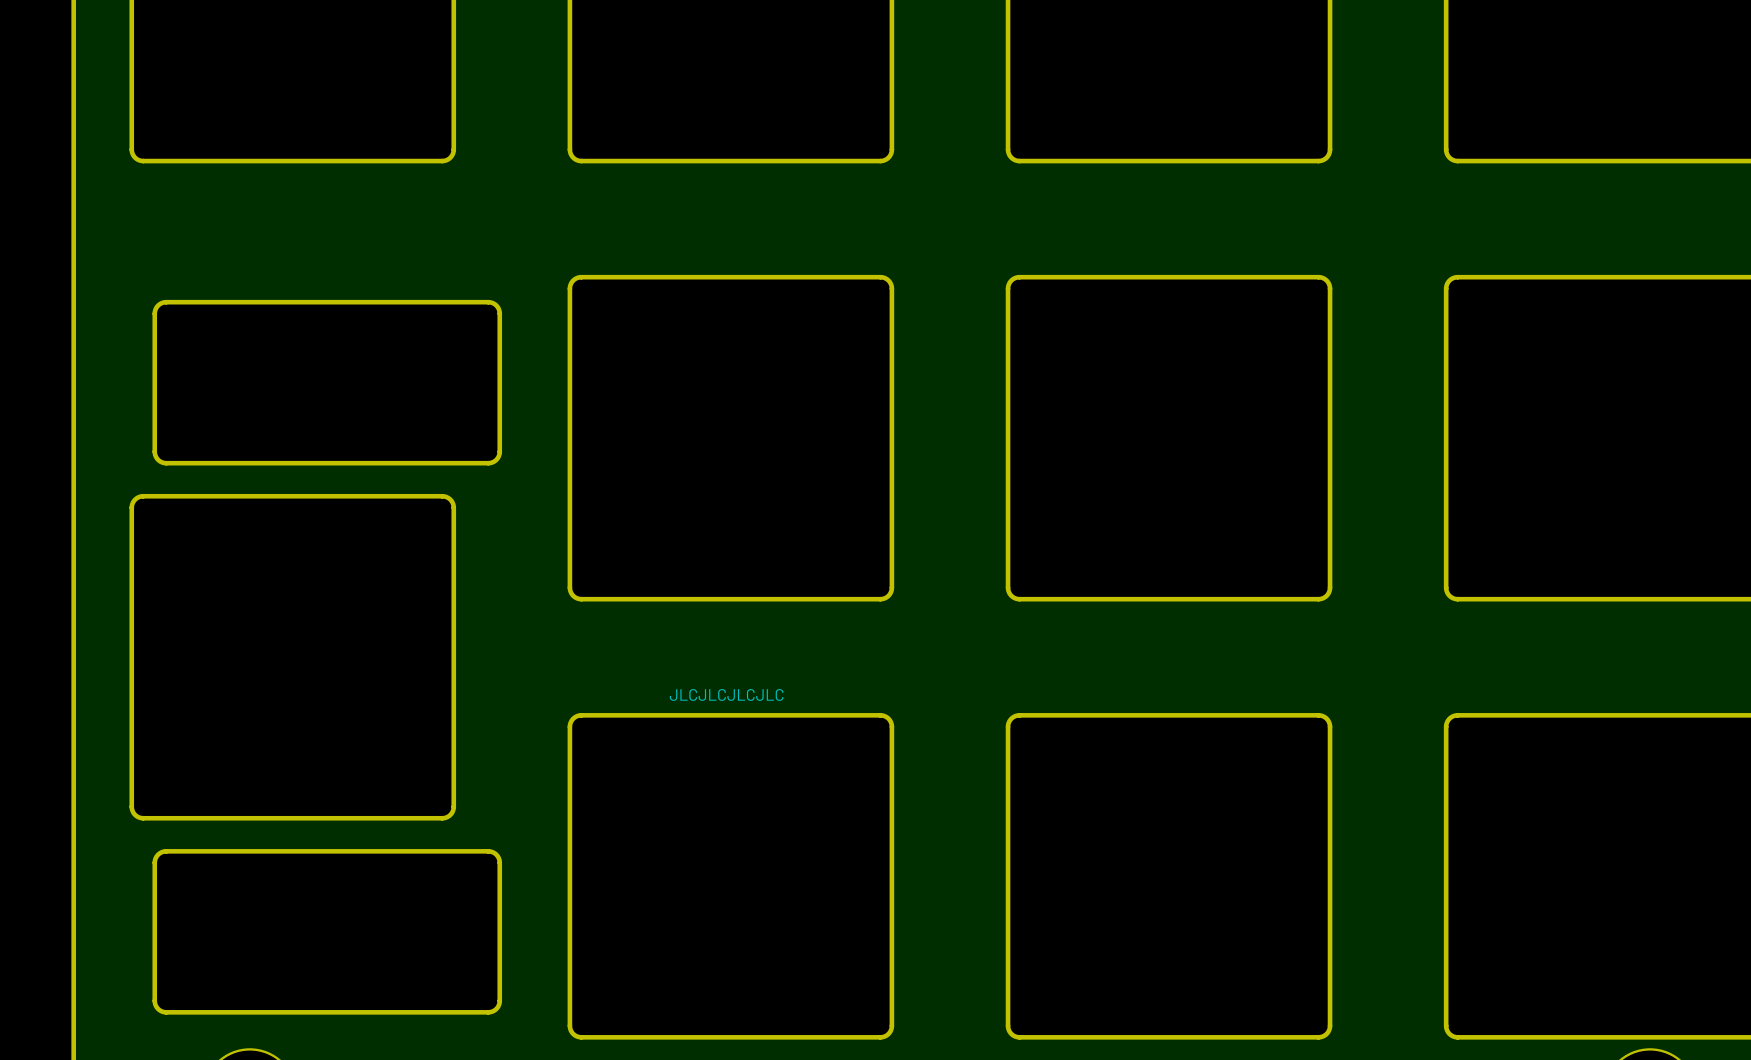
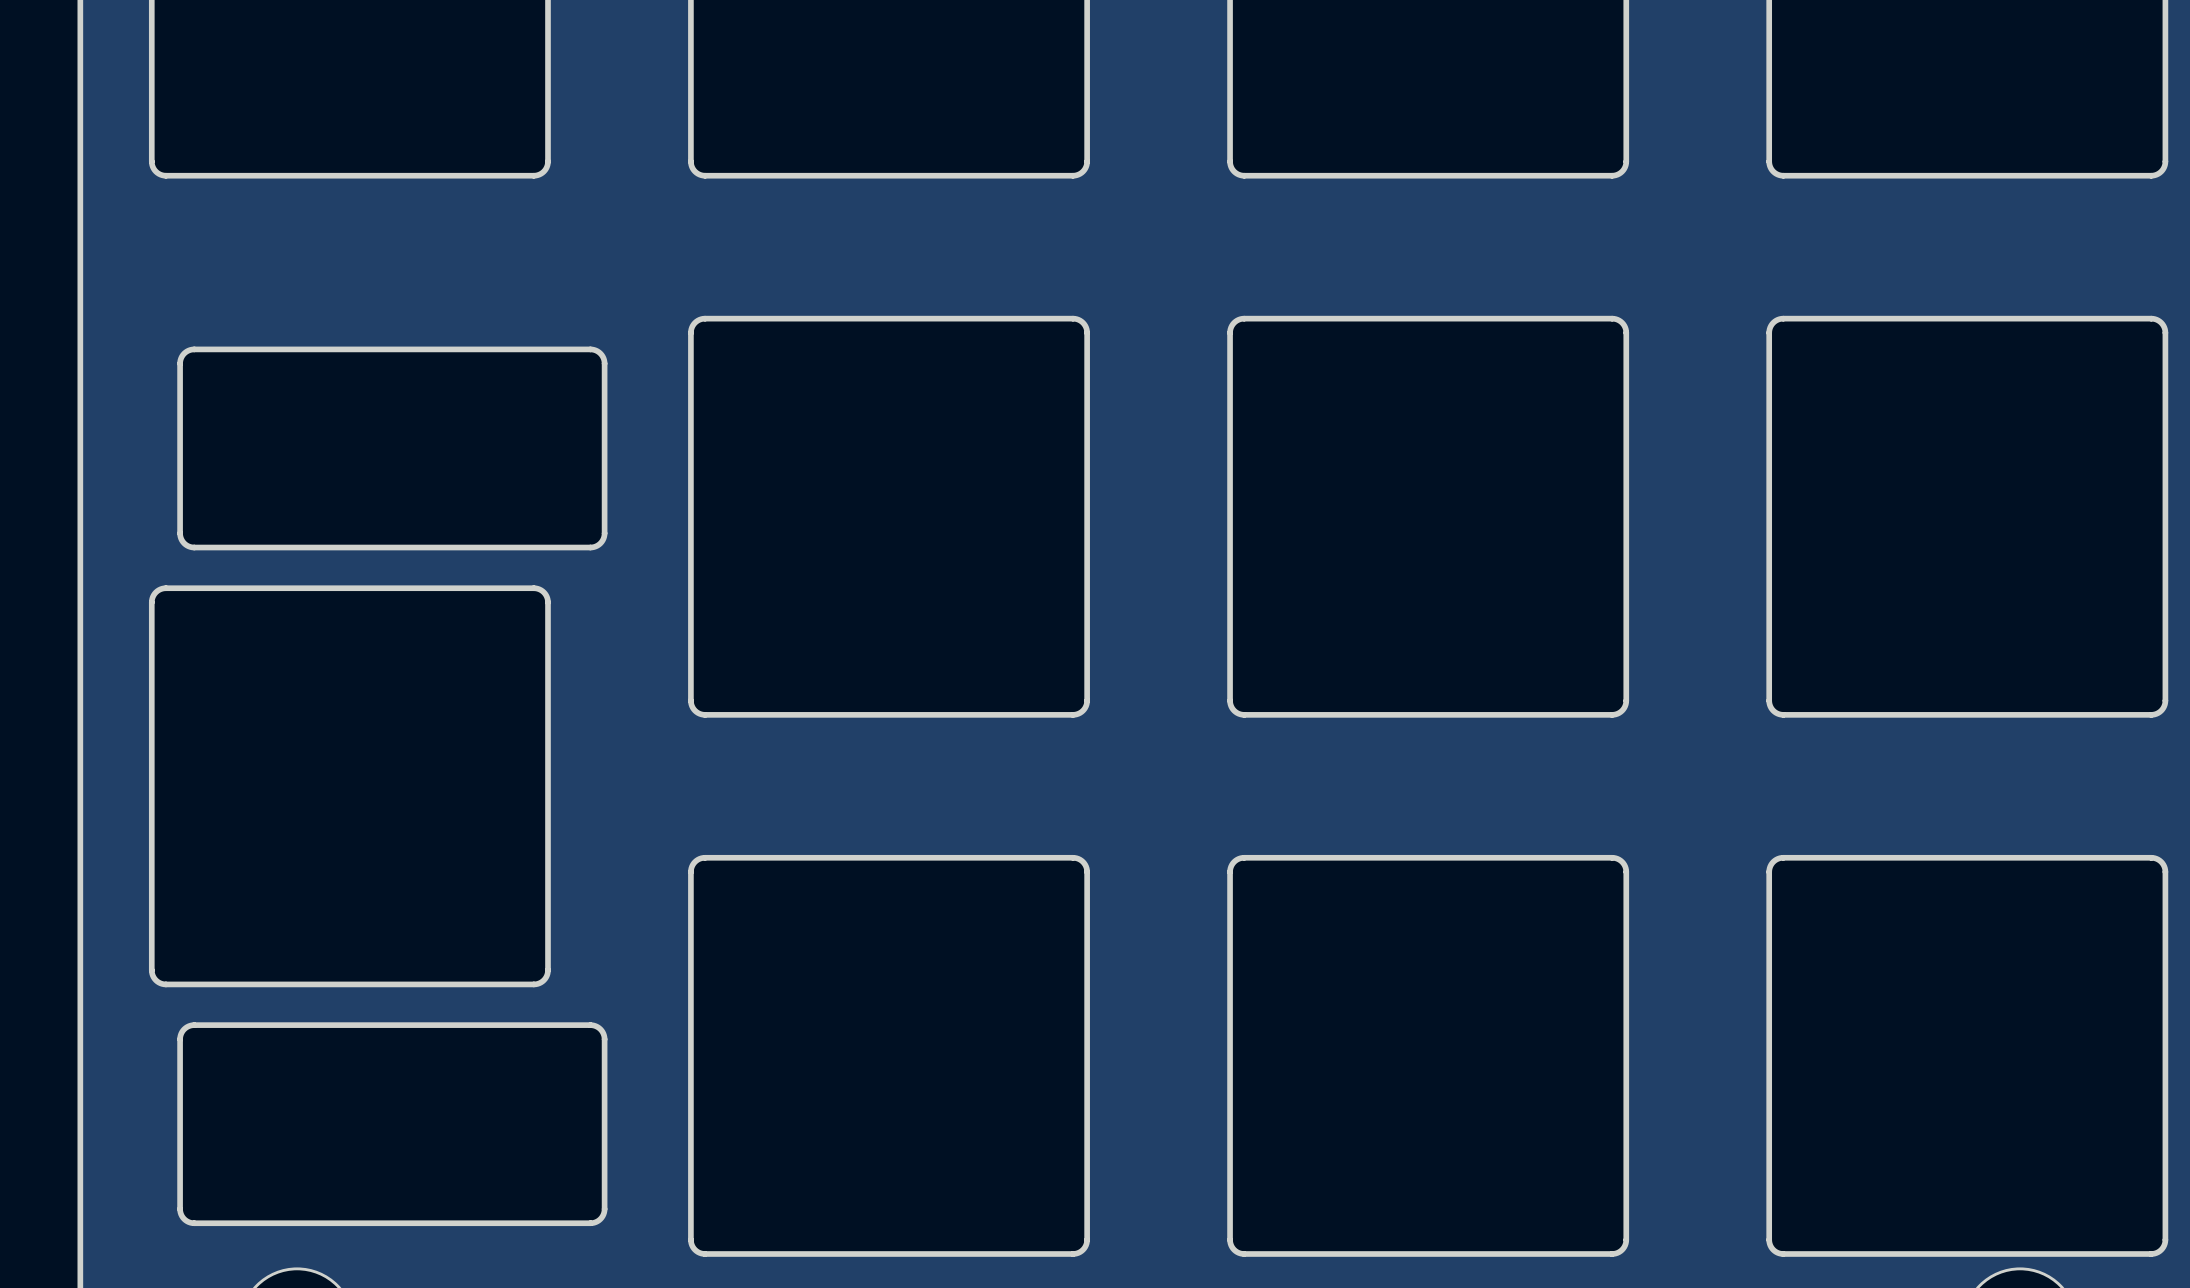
text: JLCJLCJLCJLC (726, 694) -> none

